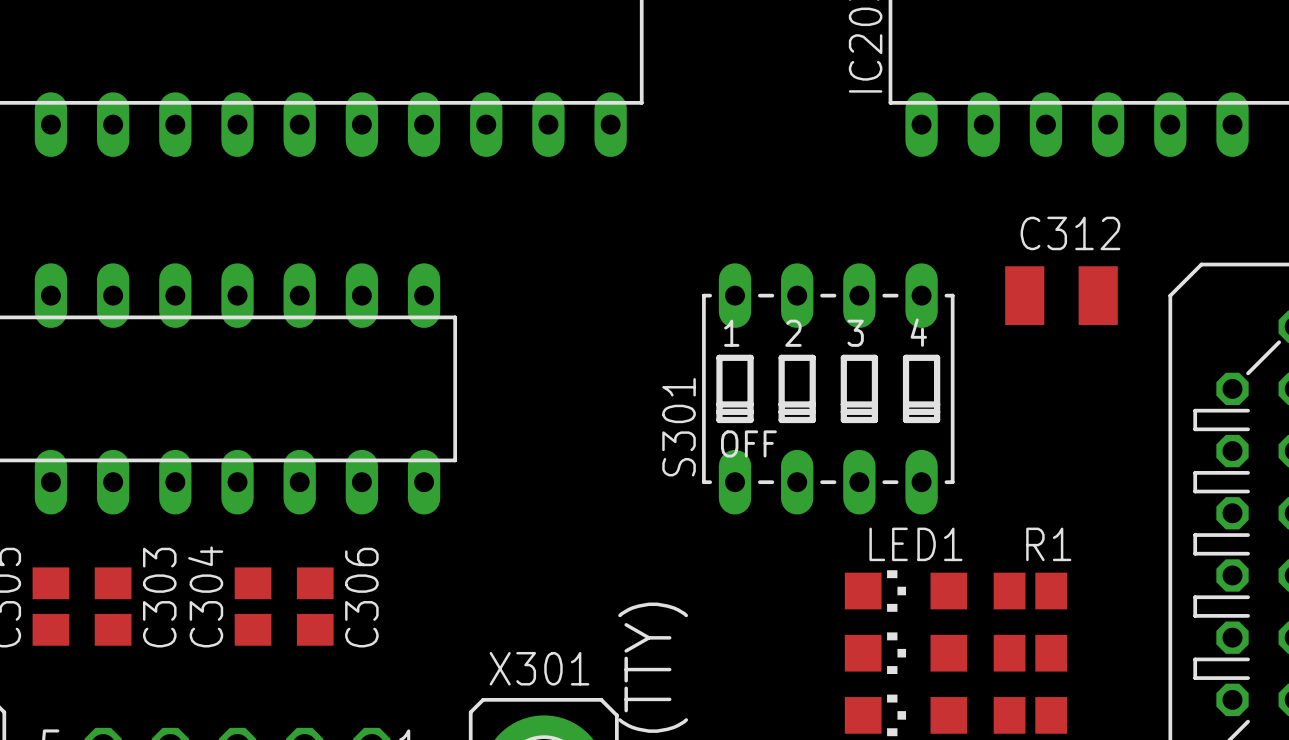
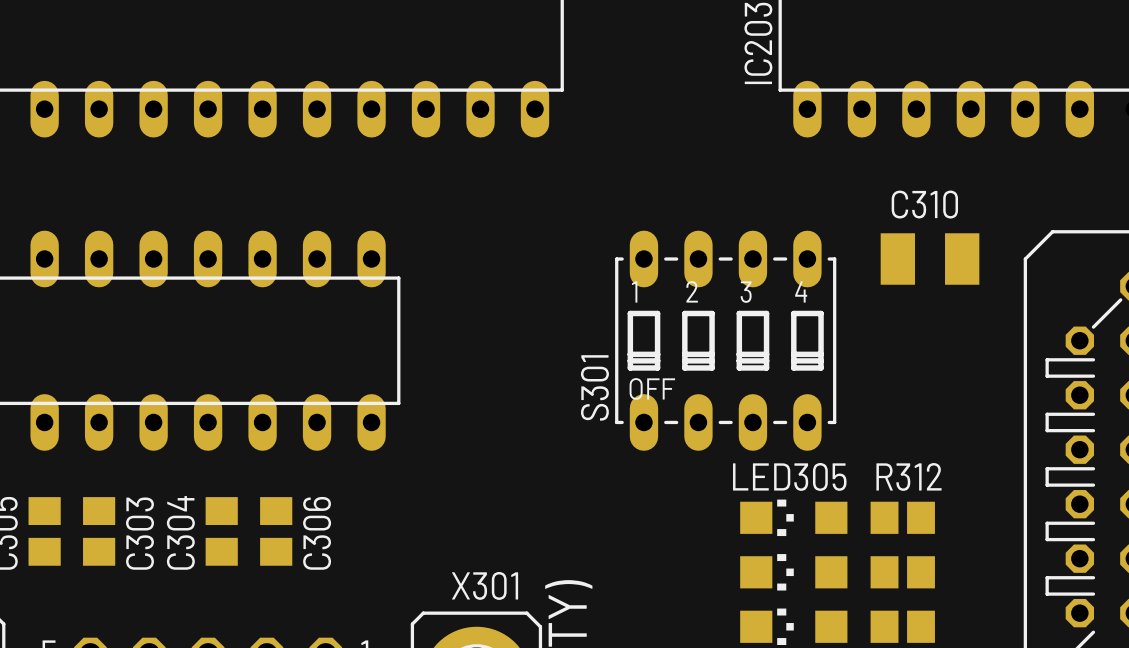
C312 name: C312 (1070, 233) -> C310 (924, 204)
LED1 name: LED1 (915, 544) -> LED305 (789, 476)
R1 name: R1 (1048, 544) -> R312 (909, 476)

